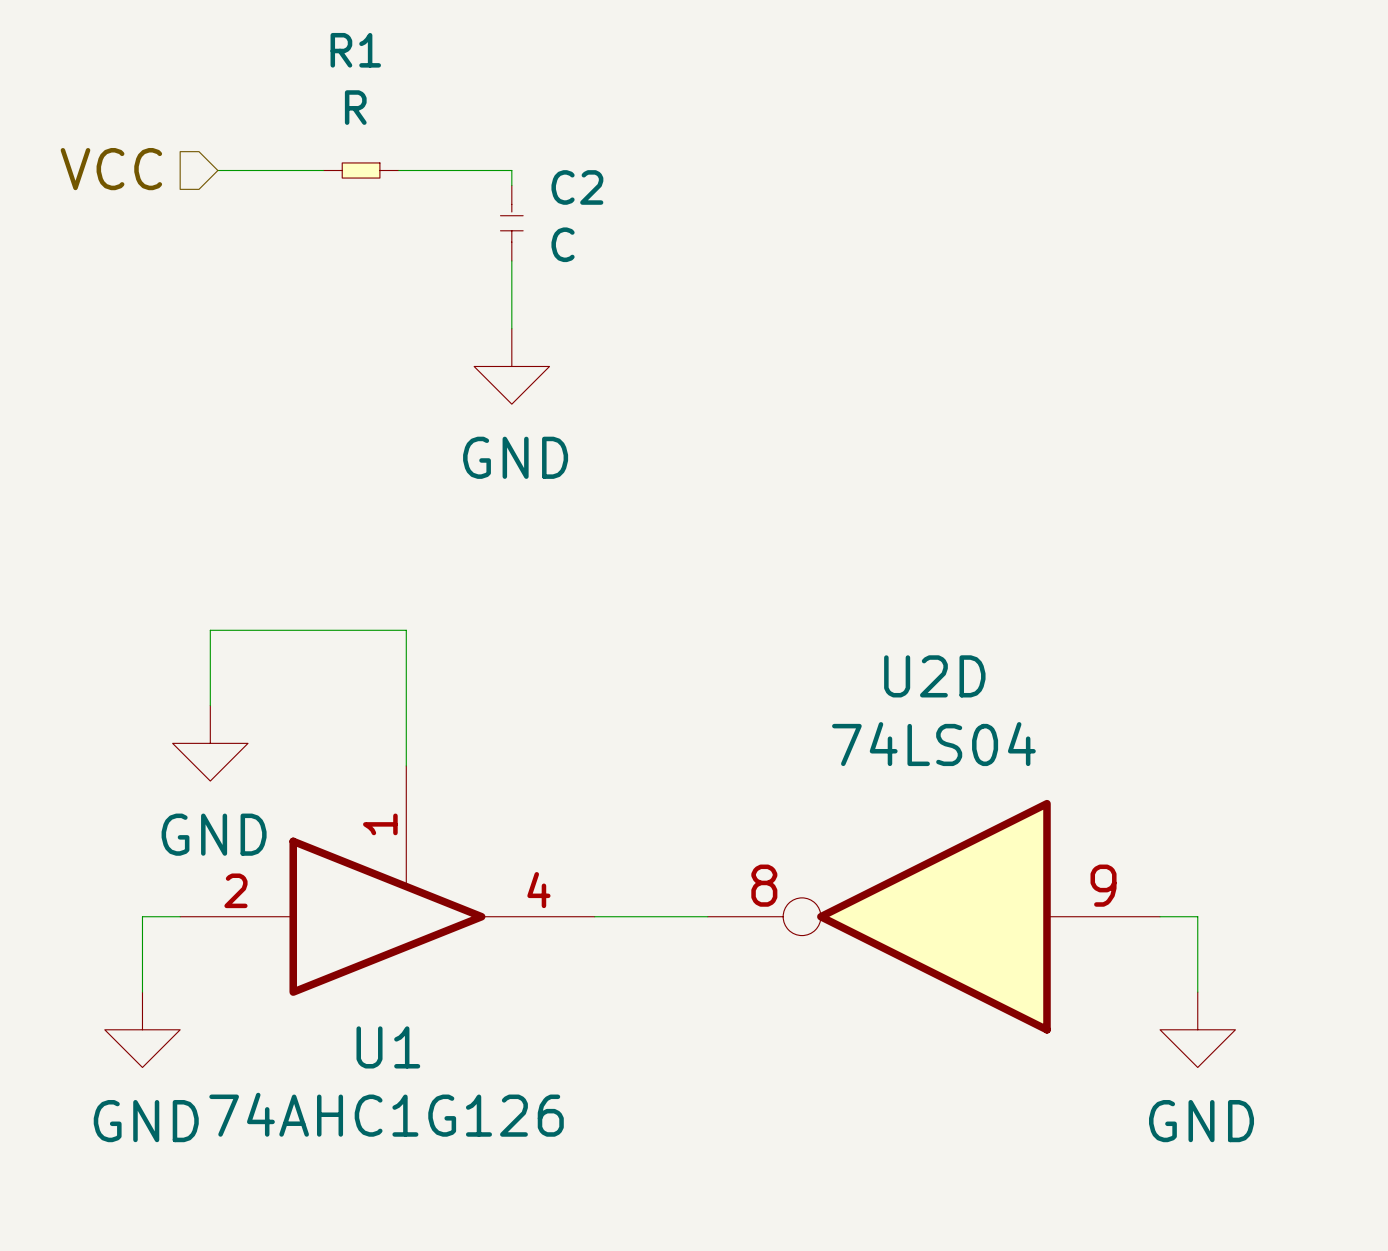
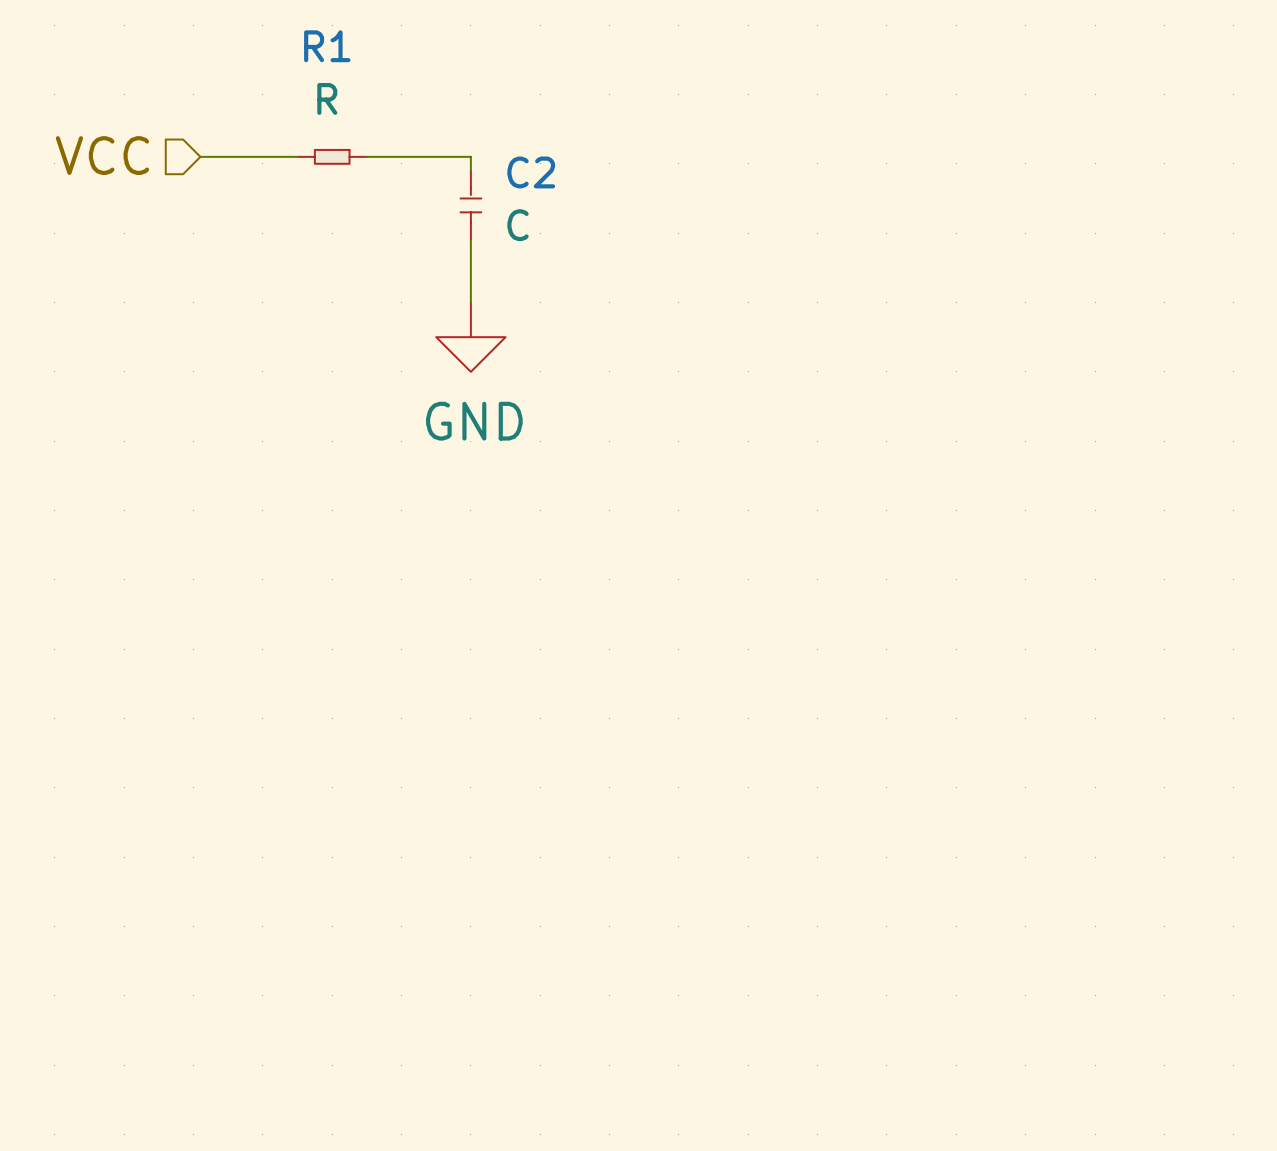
wire: (210, 705) (210, 630) (406, 630) (406, 765) -> none
power symbol: GND (210, 743) -> none
U1: 74AHC1G126 (387, 880) -> none
wire: (180, 916) (142, 916) (142, 992) -> none
wire: (594, 916) (707, 916) -> none
U2D: 74LS04 (933, 916) -> none
wire: (1160, 916) (1197, 916) (1197, 992) -> none
power symbol: GND (142, 1029) -> none
power symbol: GND (1197, 1029) -> none

